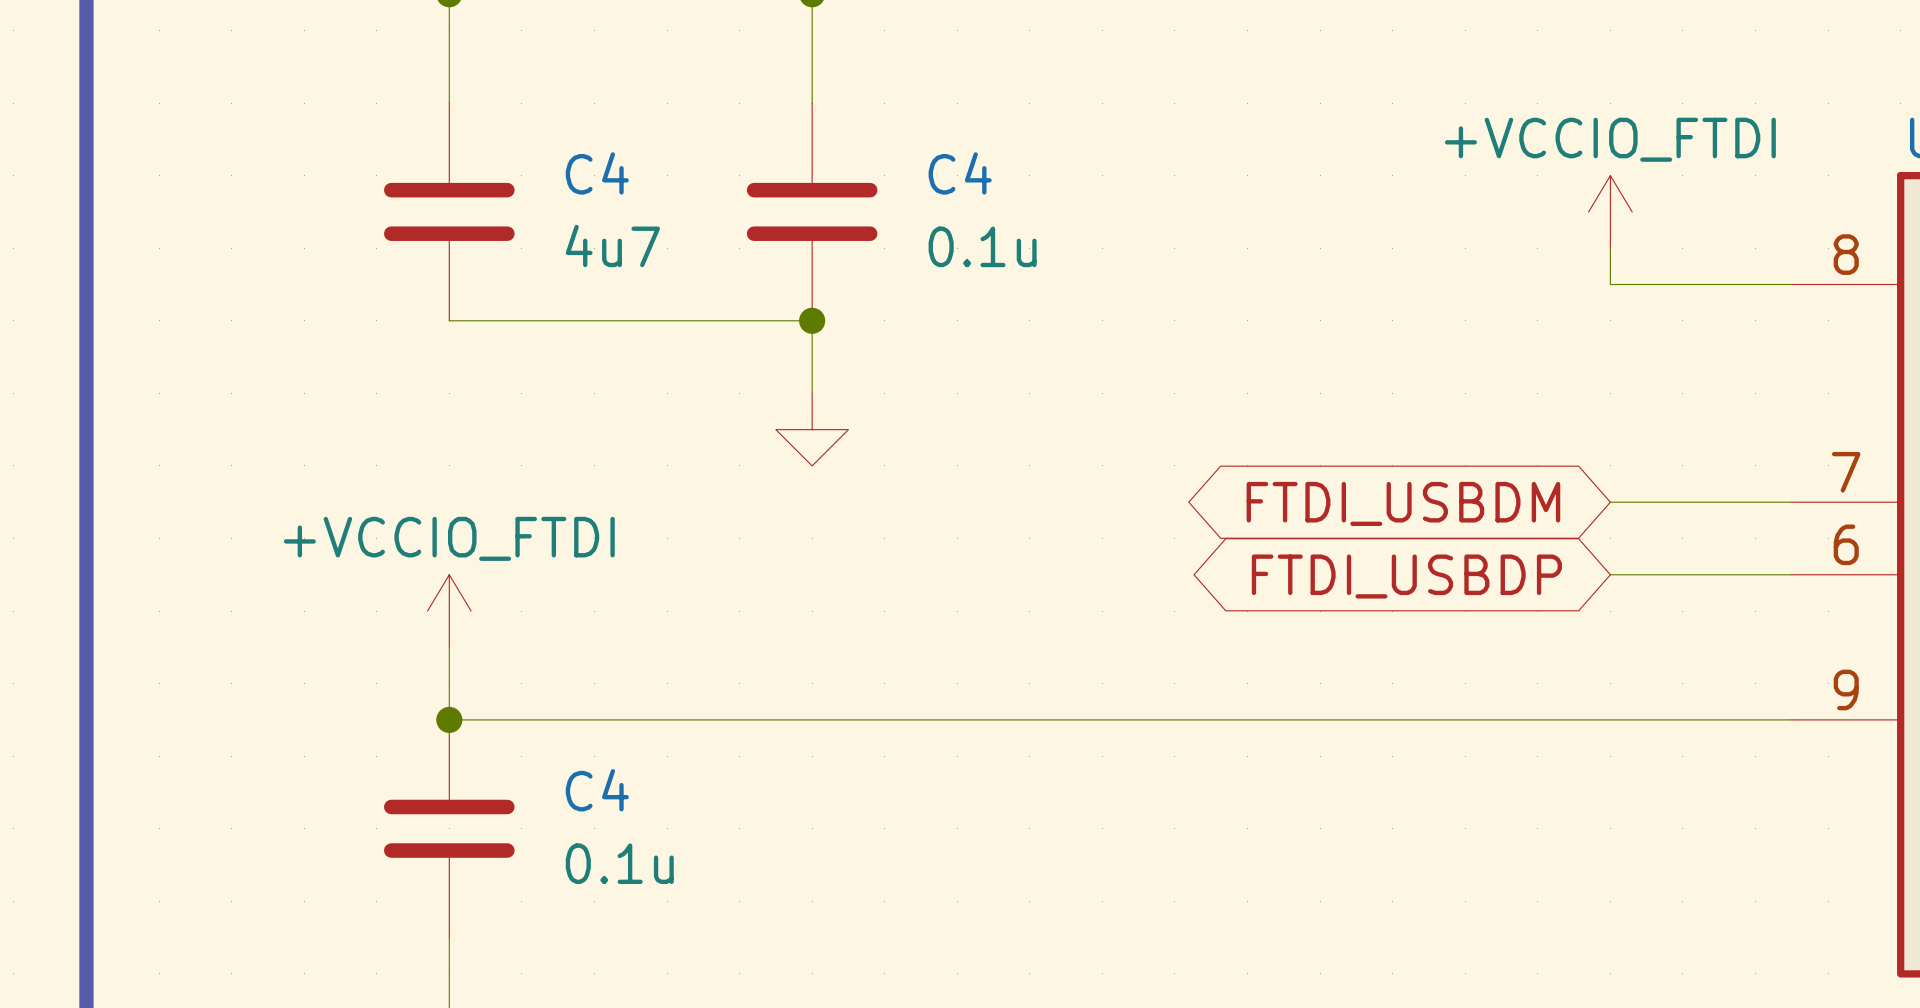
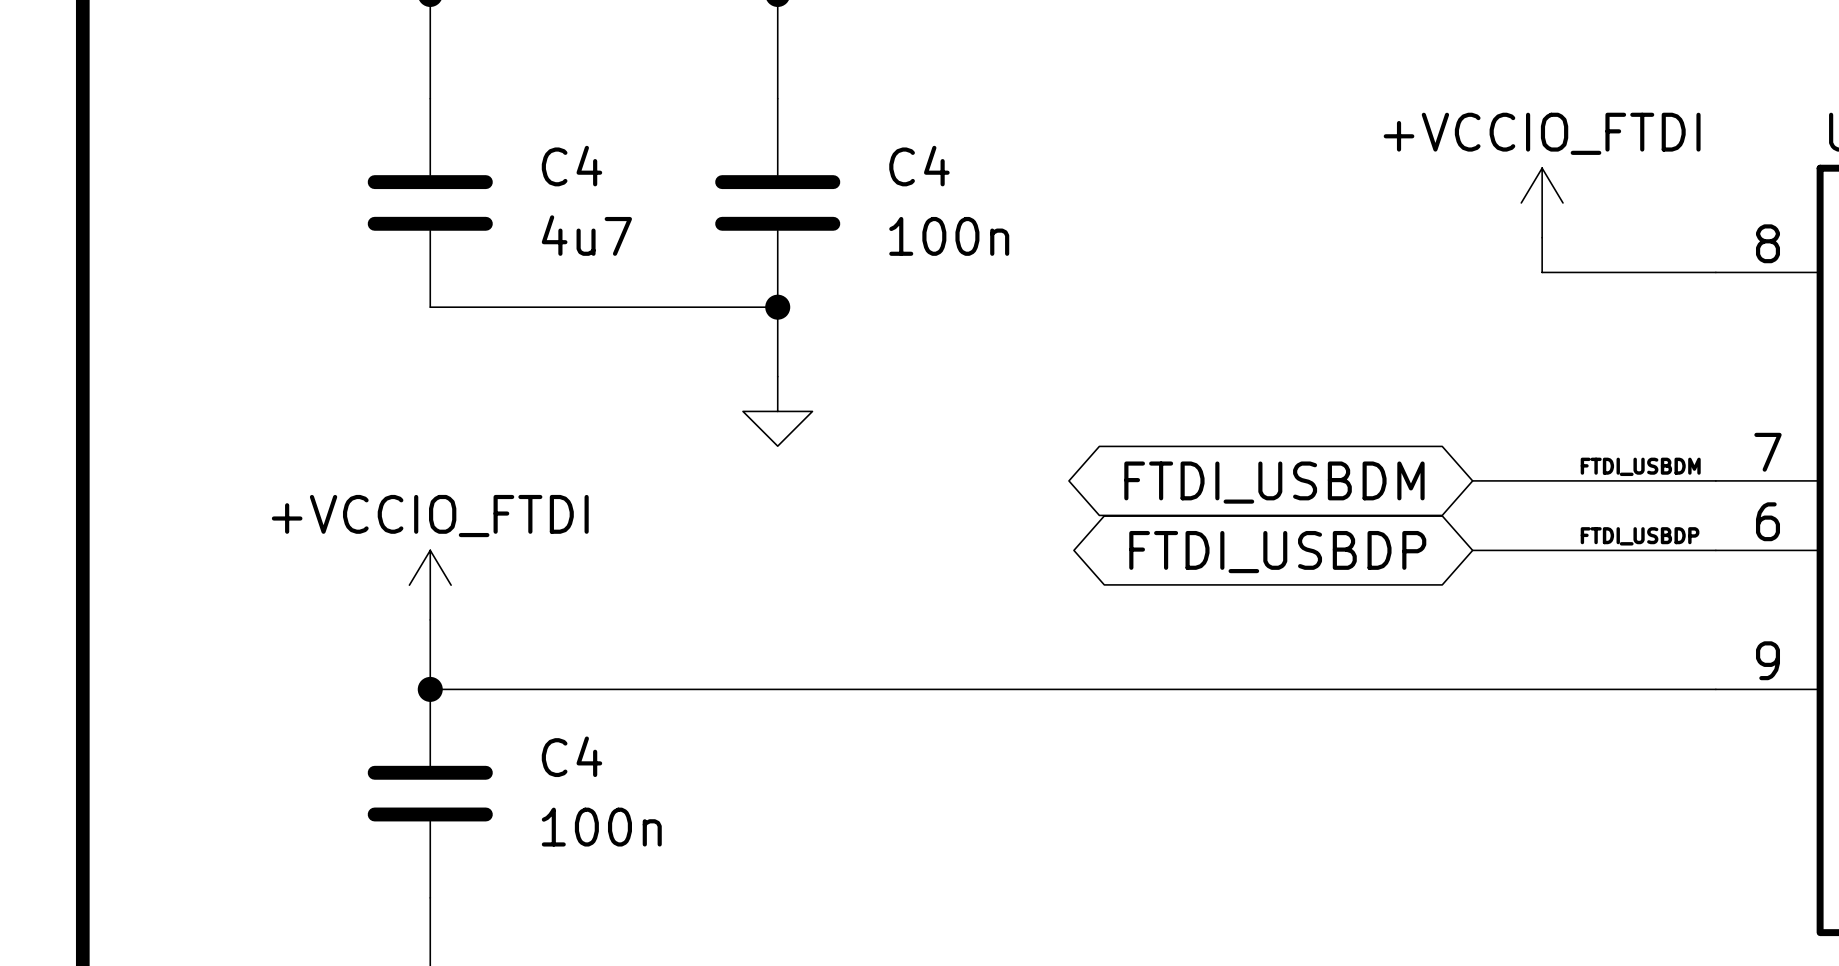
C4 value: 0.1u (982, 246) -> 100n (949, 236)
label: none -> FTDI_USBDM (1640, 466)
wire: none -> (1472, 480) (1542, 480)
global label position: FTDI_USBDM (1403, 503) -> FTDI_USBDM (1274, 482)
label: none -> FTDI_USBDP (1640, 536)
wire: none -> (1472, 550) (1542, 550)
global label position: FTDI_USBDP (1406, 576) -> FTDI_USBDP (1277, 552)
C4 value: 0.1u (619, 863) -> 100n (601, 827)

